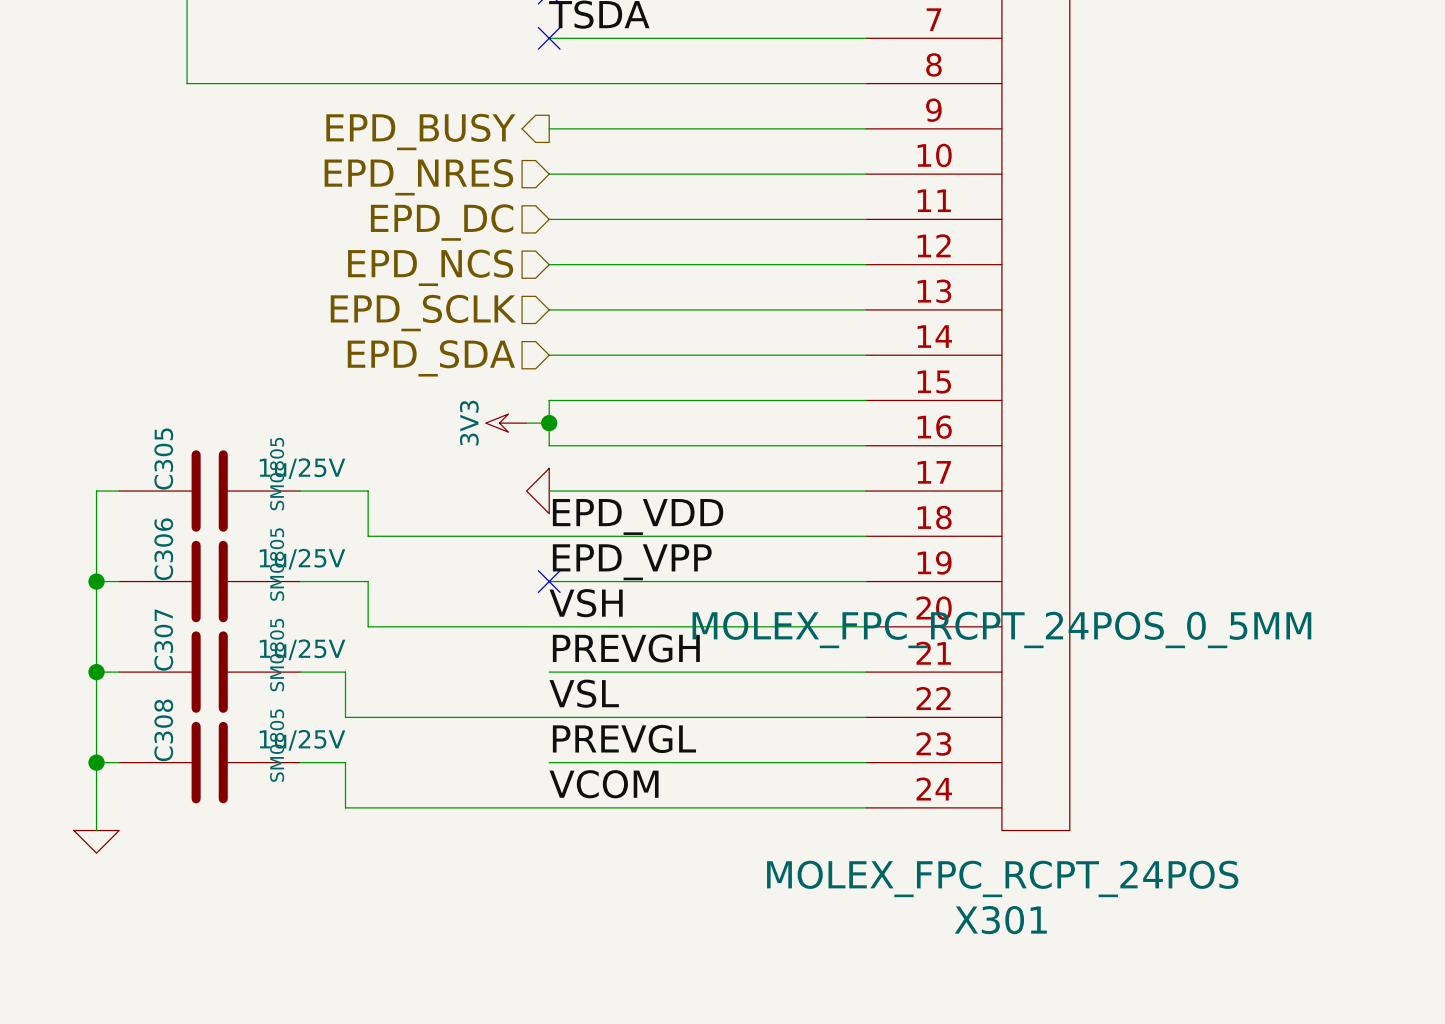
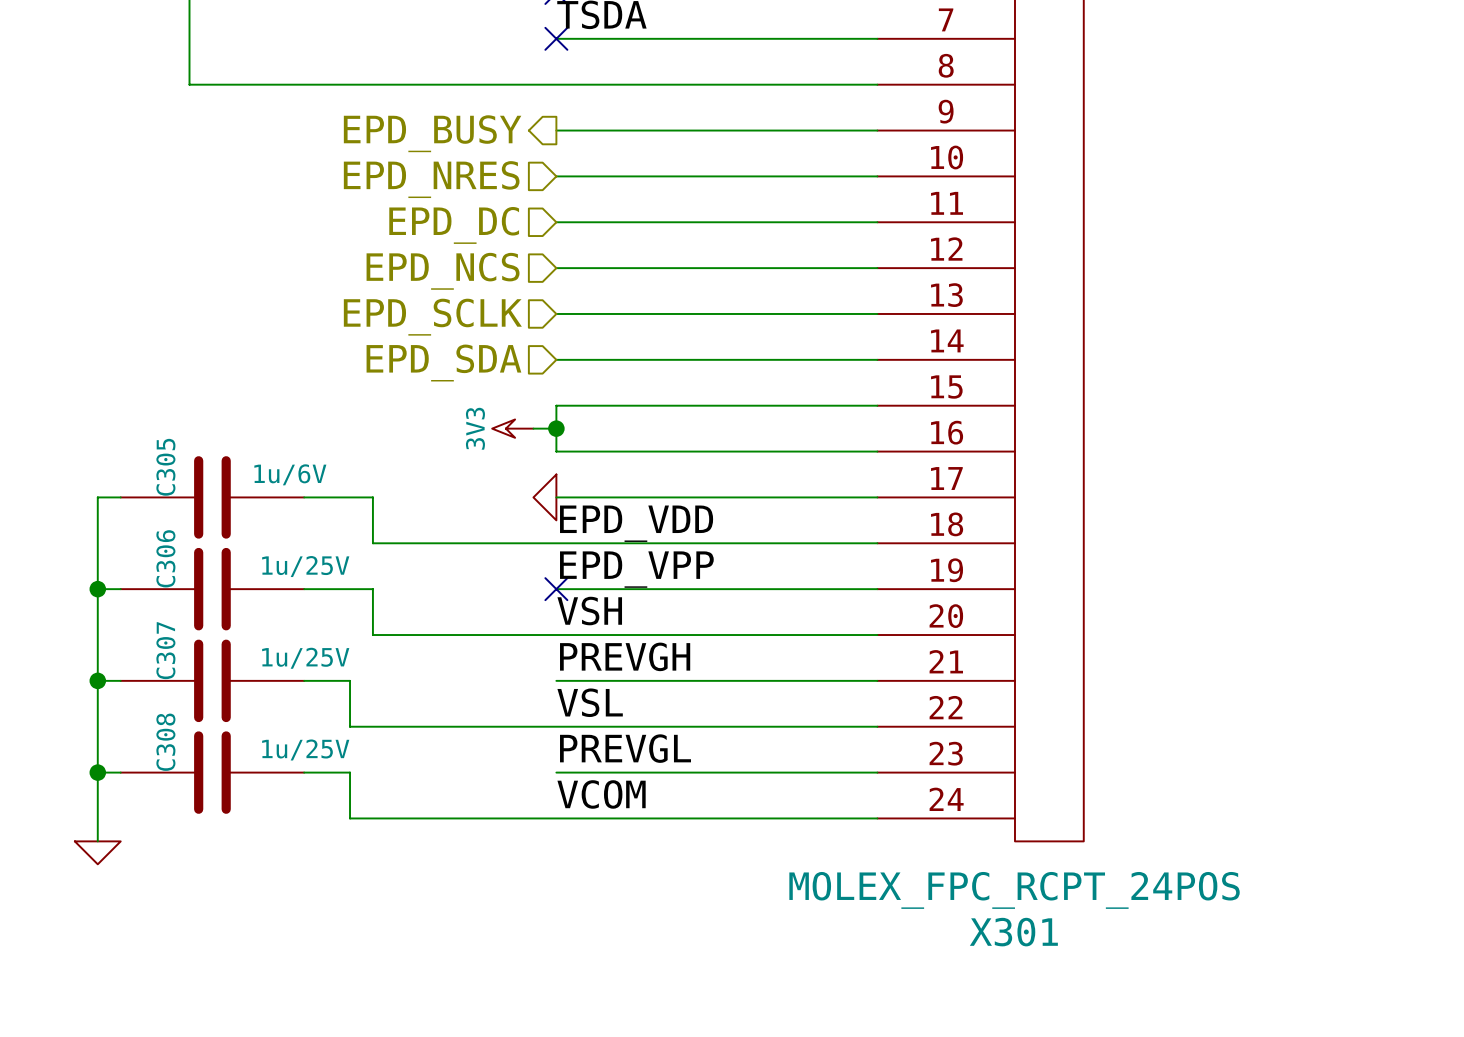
C305 value: 1u/25V (302, 468) -> 1u/6V (290, 474)
C305 text: SM0805 (277, 474) -> none
C306 text: SM0805 (277, 564) -> none
X301 text: MOLEX_FPC_RCPT_24POS_0_5MM (1001, 629) -> none
C307 text: SM0805 (277, 655) -> none
C308 text: SM0805 (277, 745) -> none

